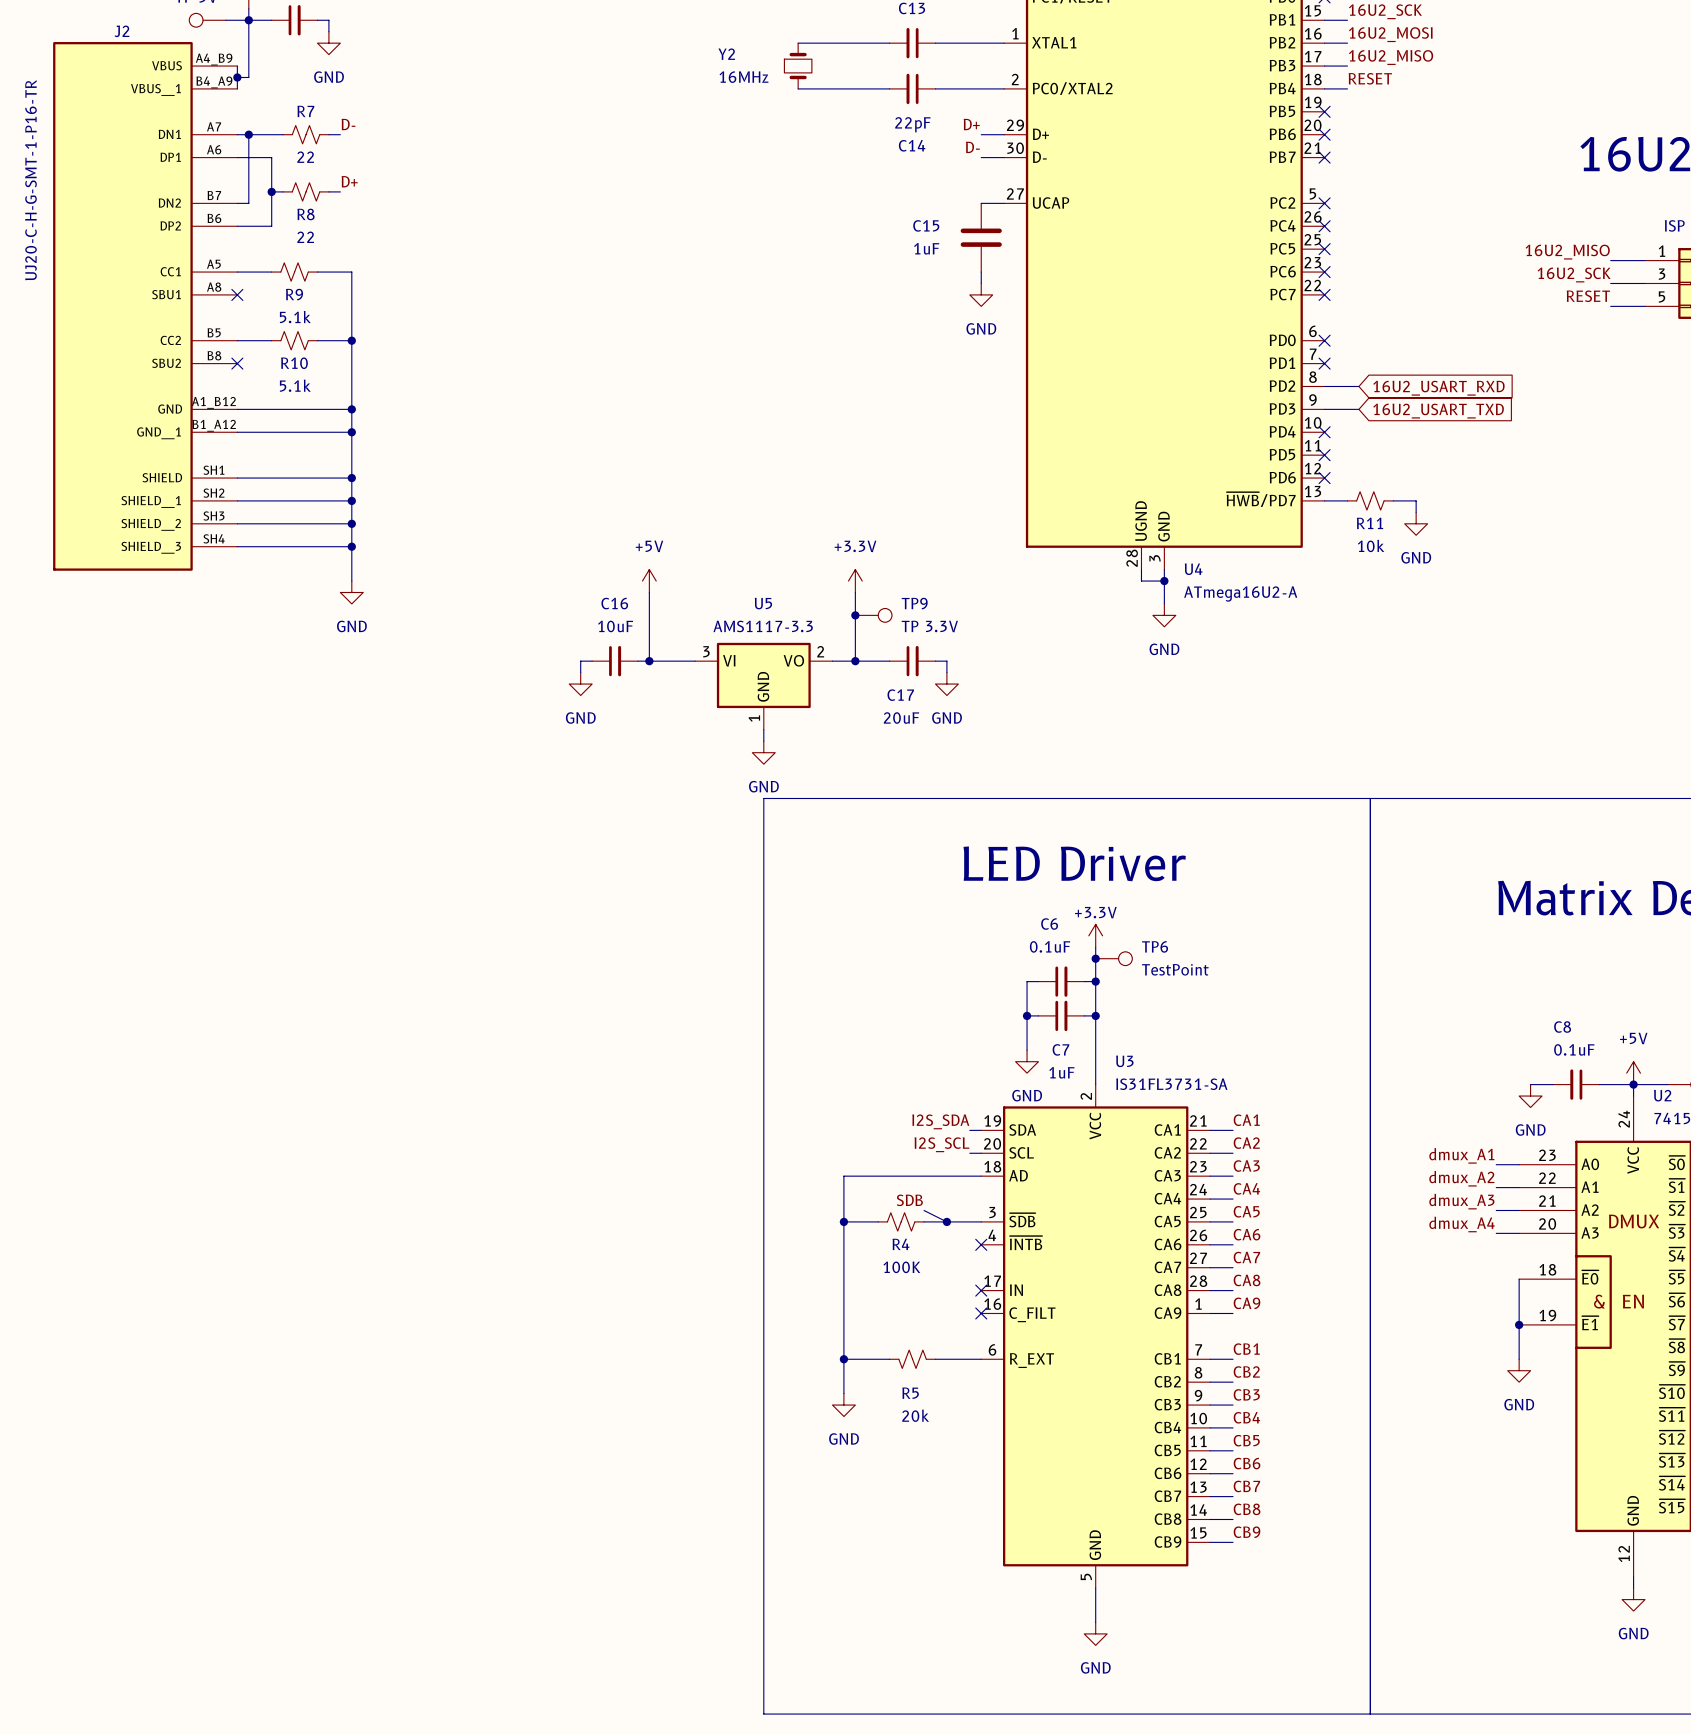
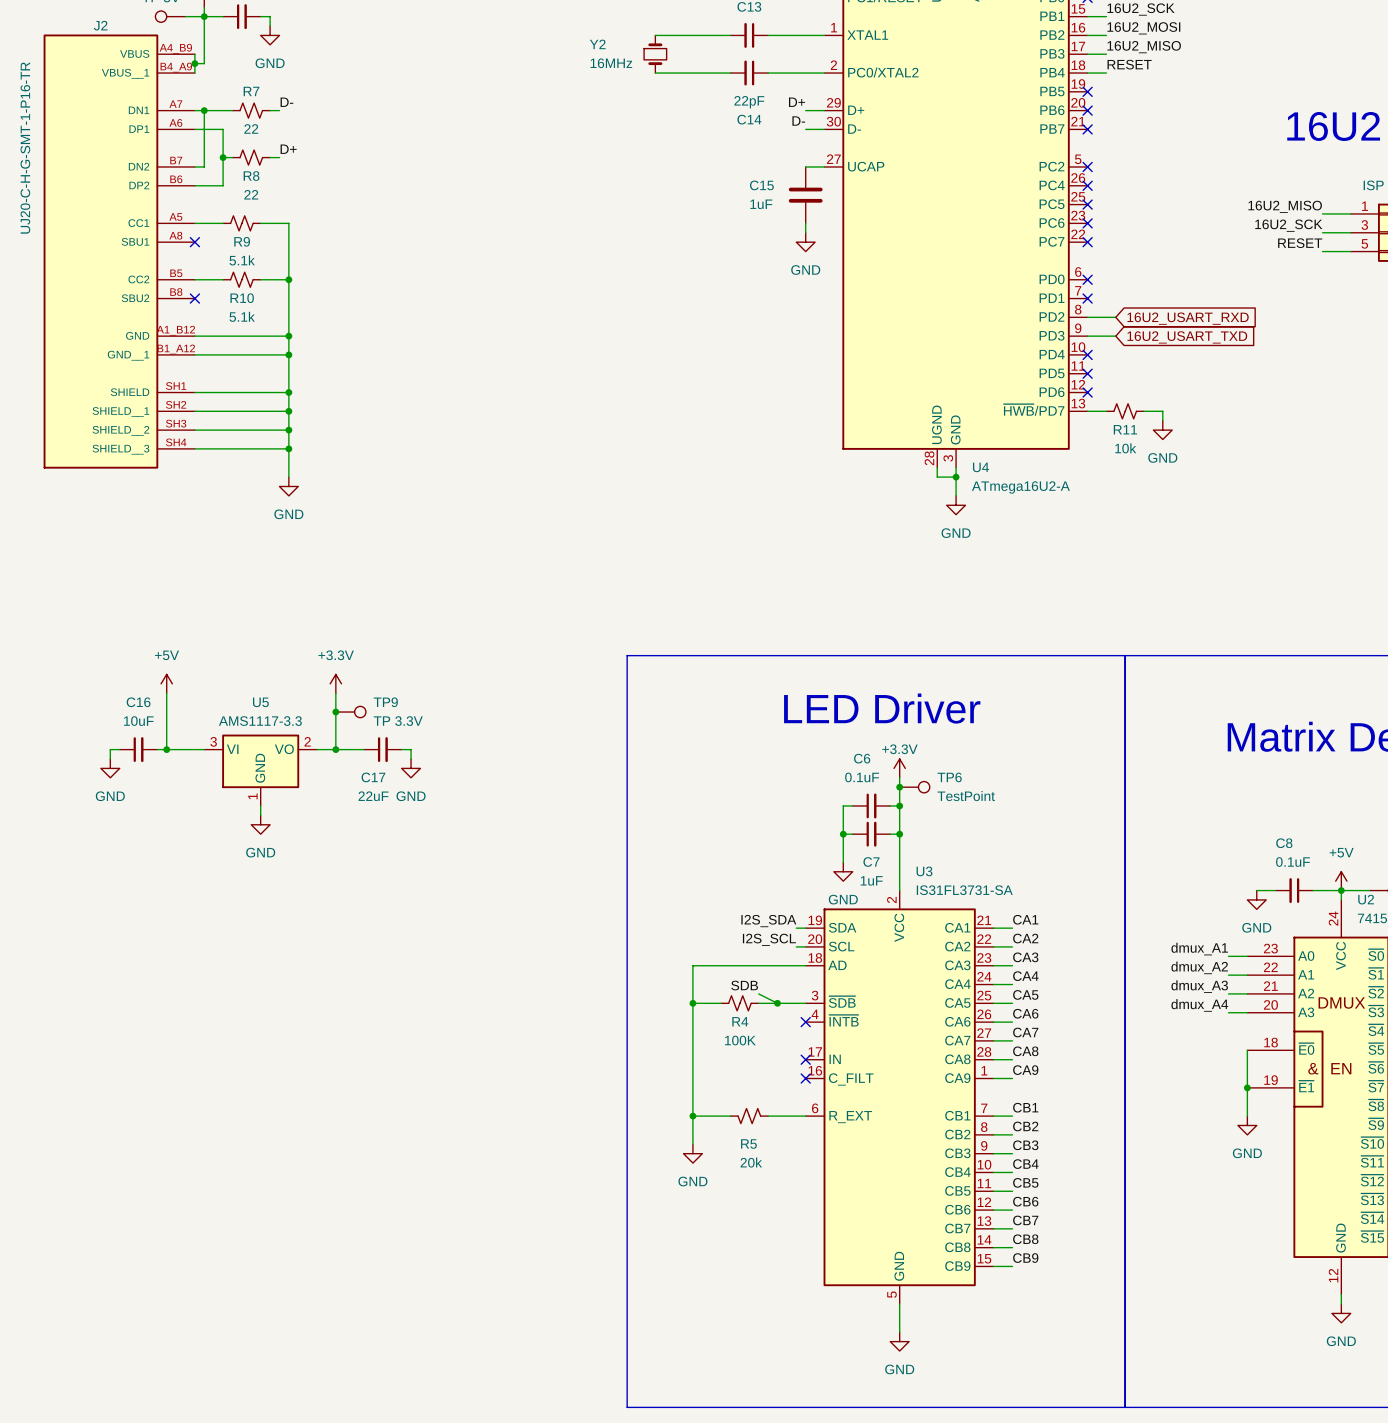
power symbol: +5V (649, 581) -> none
power symbol: +3.3V (855, 581) -> none
wire: (649, 592) (649, 661) -> none
wire: (855, 592) (855, 661) -> none
junction: (855, 615) -> none
TP9 position: (873, 615) -> (350, 712)
wire: (592, 661) (580, 661) (580, 672) -> none
C16 position: (615, 661) -> (138, 749)
wire: (637, 661) (695, 661) -> none
junction: (649, 661) -> none
wire: (832, 661) (889, 661) -> none
junction: (855, 661) -> none
C17 position: (912, 661) -> (382, 749)
wire: (935, 661) (946, 661) (946, 672) -> none
power symbol: GND (580, 684) -> none
power symbol: GND (946, 684) -> none
U5 position: (763, 686) -> (260, 770)
C17 value: 20uF (901, 718) -> 22uF (373, 796)
wire: (763, 729) (763, 741) -> none
power symbol: GND (763, 752) -> none
power symbol: none -> +5V (166, 683)
power symbol: none -> +3.3V (335, 683)
wire: none -> (166, 693) (166, 749)
wire: none -> (335, 693) (335, 749)
junction: none -> (335, 712)
wire: none -> (119, 749) (110, 749) (110, 759)
wire: none -> (157, 749) (204, 749)
junction: none -> (166, 749)
wire: none -> (317, 749) (364, 749)
junction: none -> (335, 749)
wire: none -> (401, 749) (411, 749) (411, 759)
power symbol: none -> GND (110, 768)
power symbol: none -> GND (411, 768)
wire: none -> (260, 805) (260, 815)
power symbol: none -> GND (260, 824)

